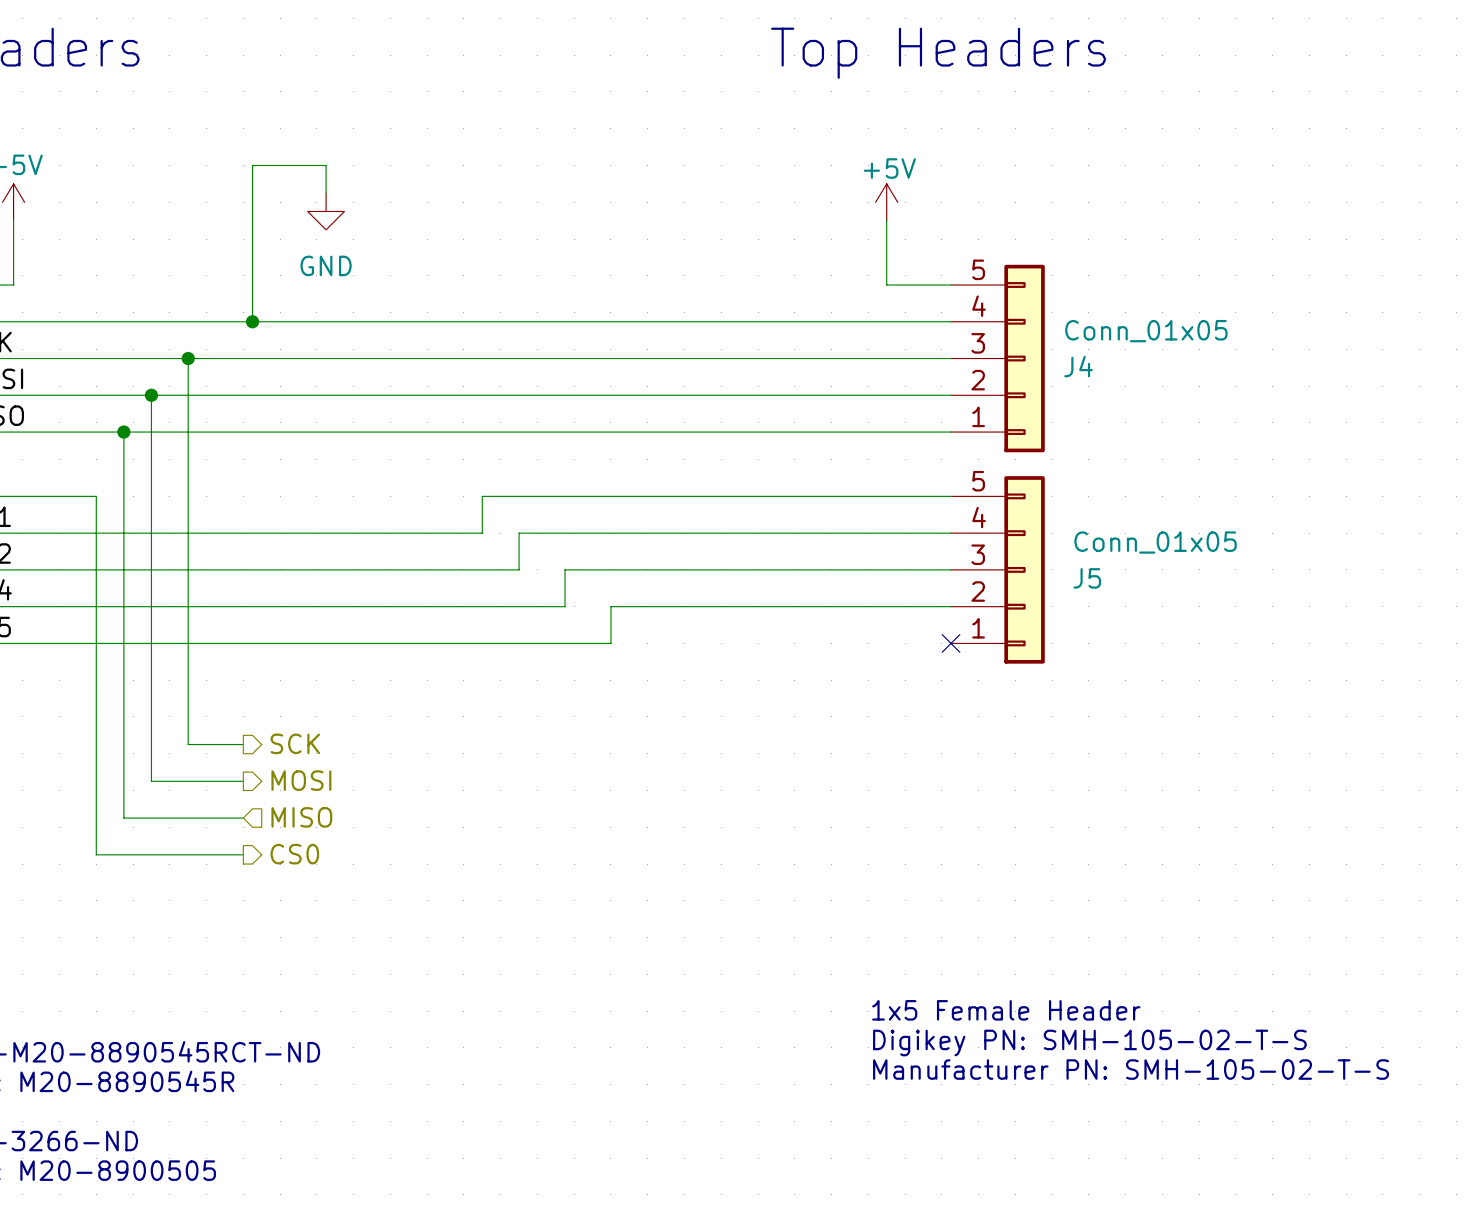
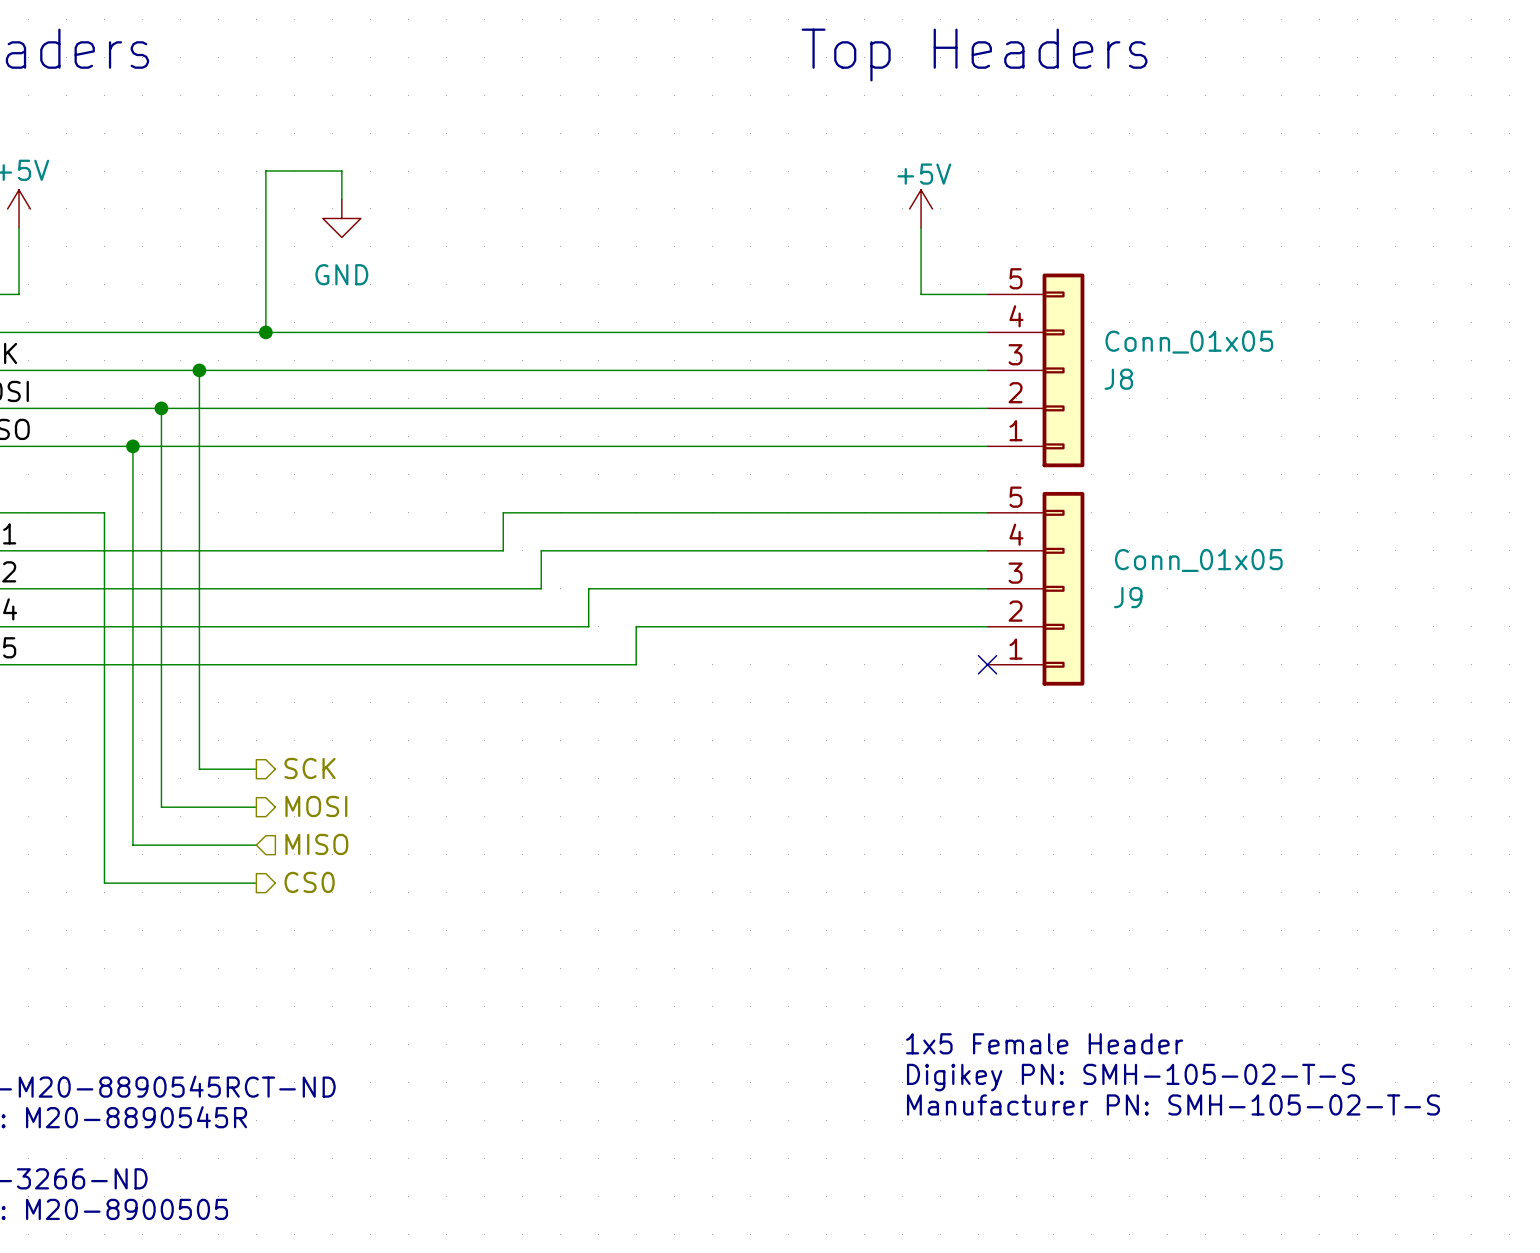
J4 name: J4 (1078, 366) -> J8 (1118, 379)
J5 name: J5 (1087, 578) -> J9 (1128, 597)

